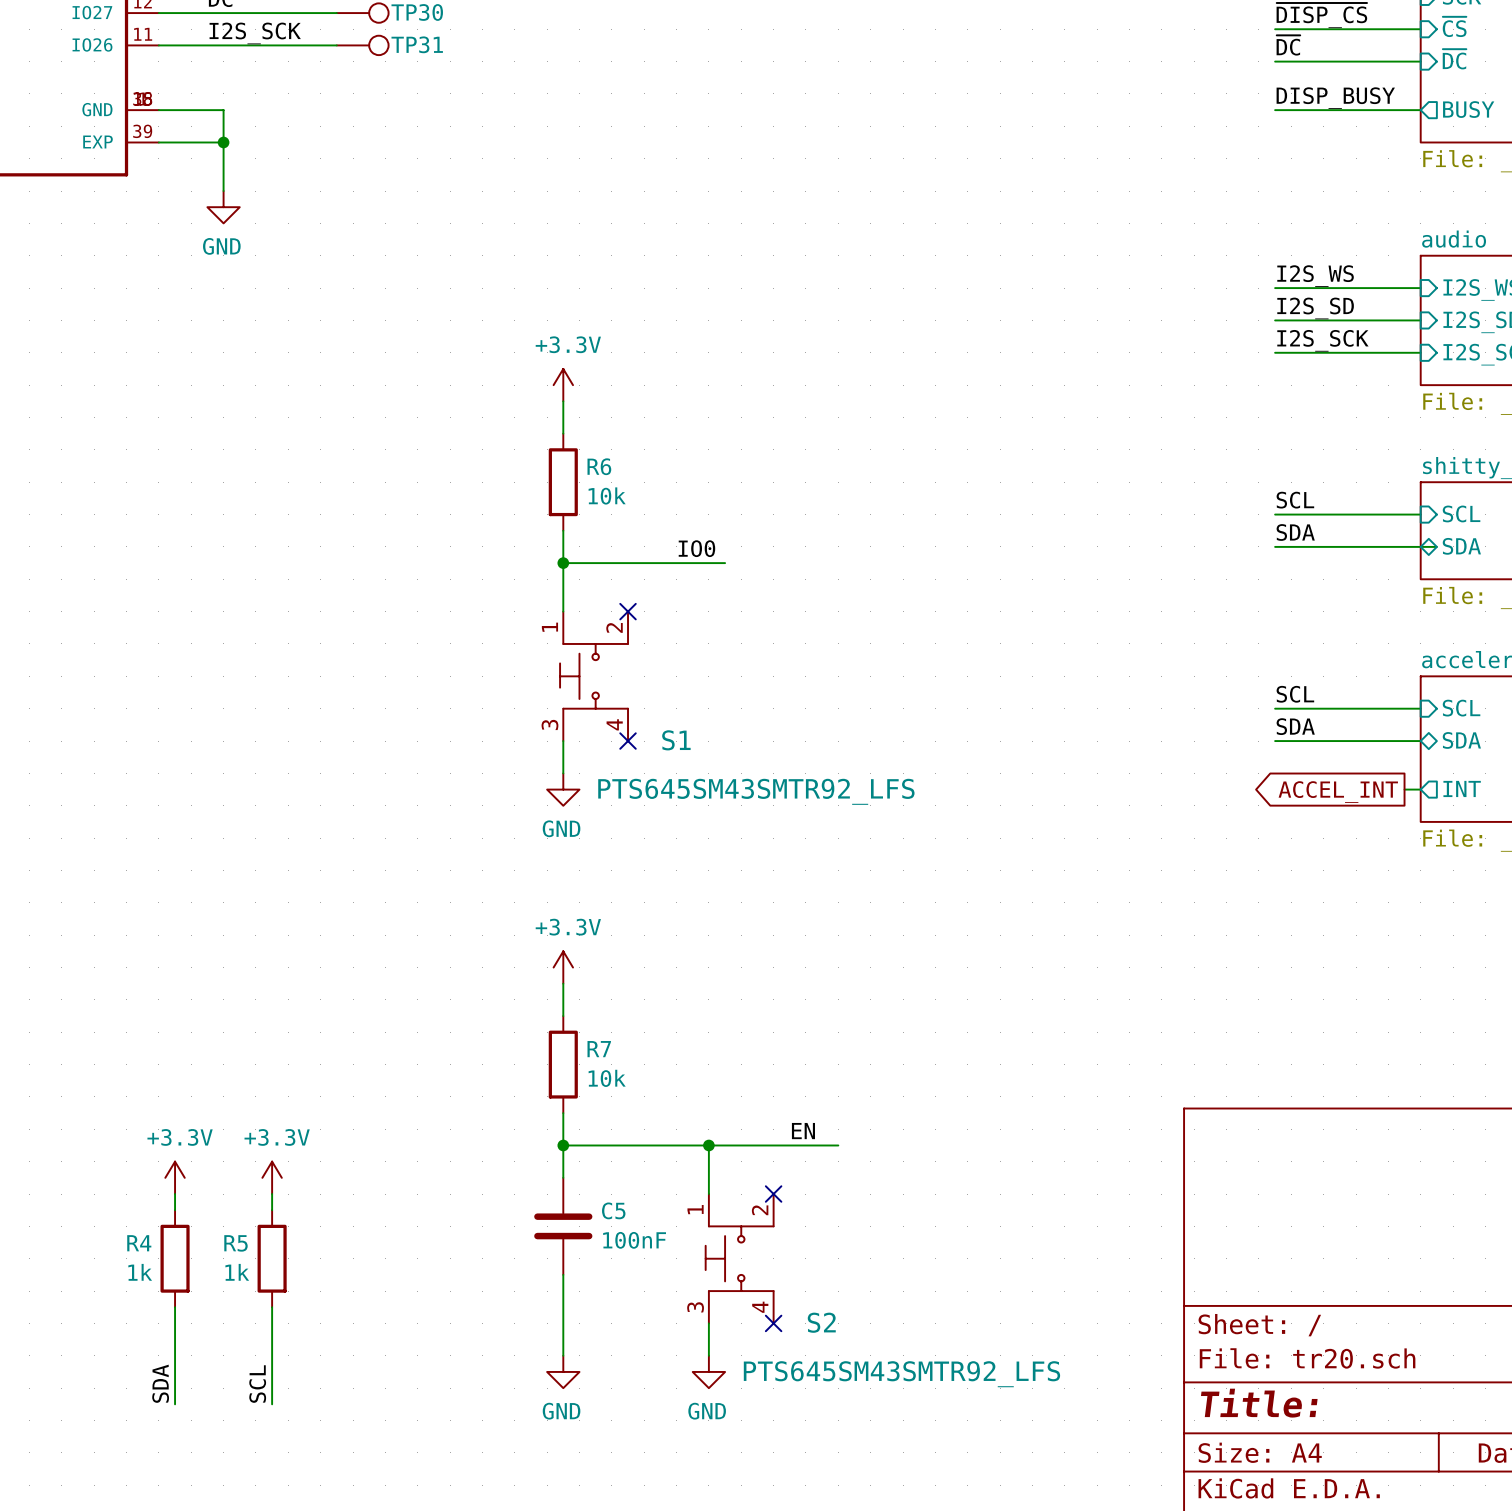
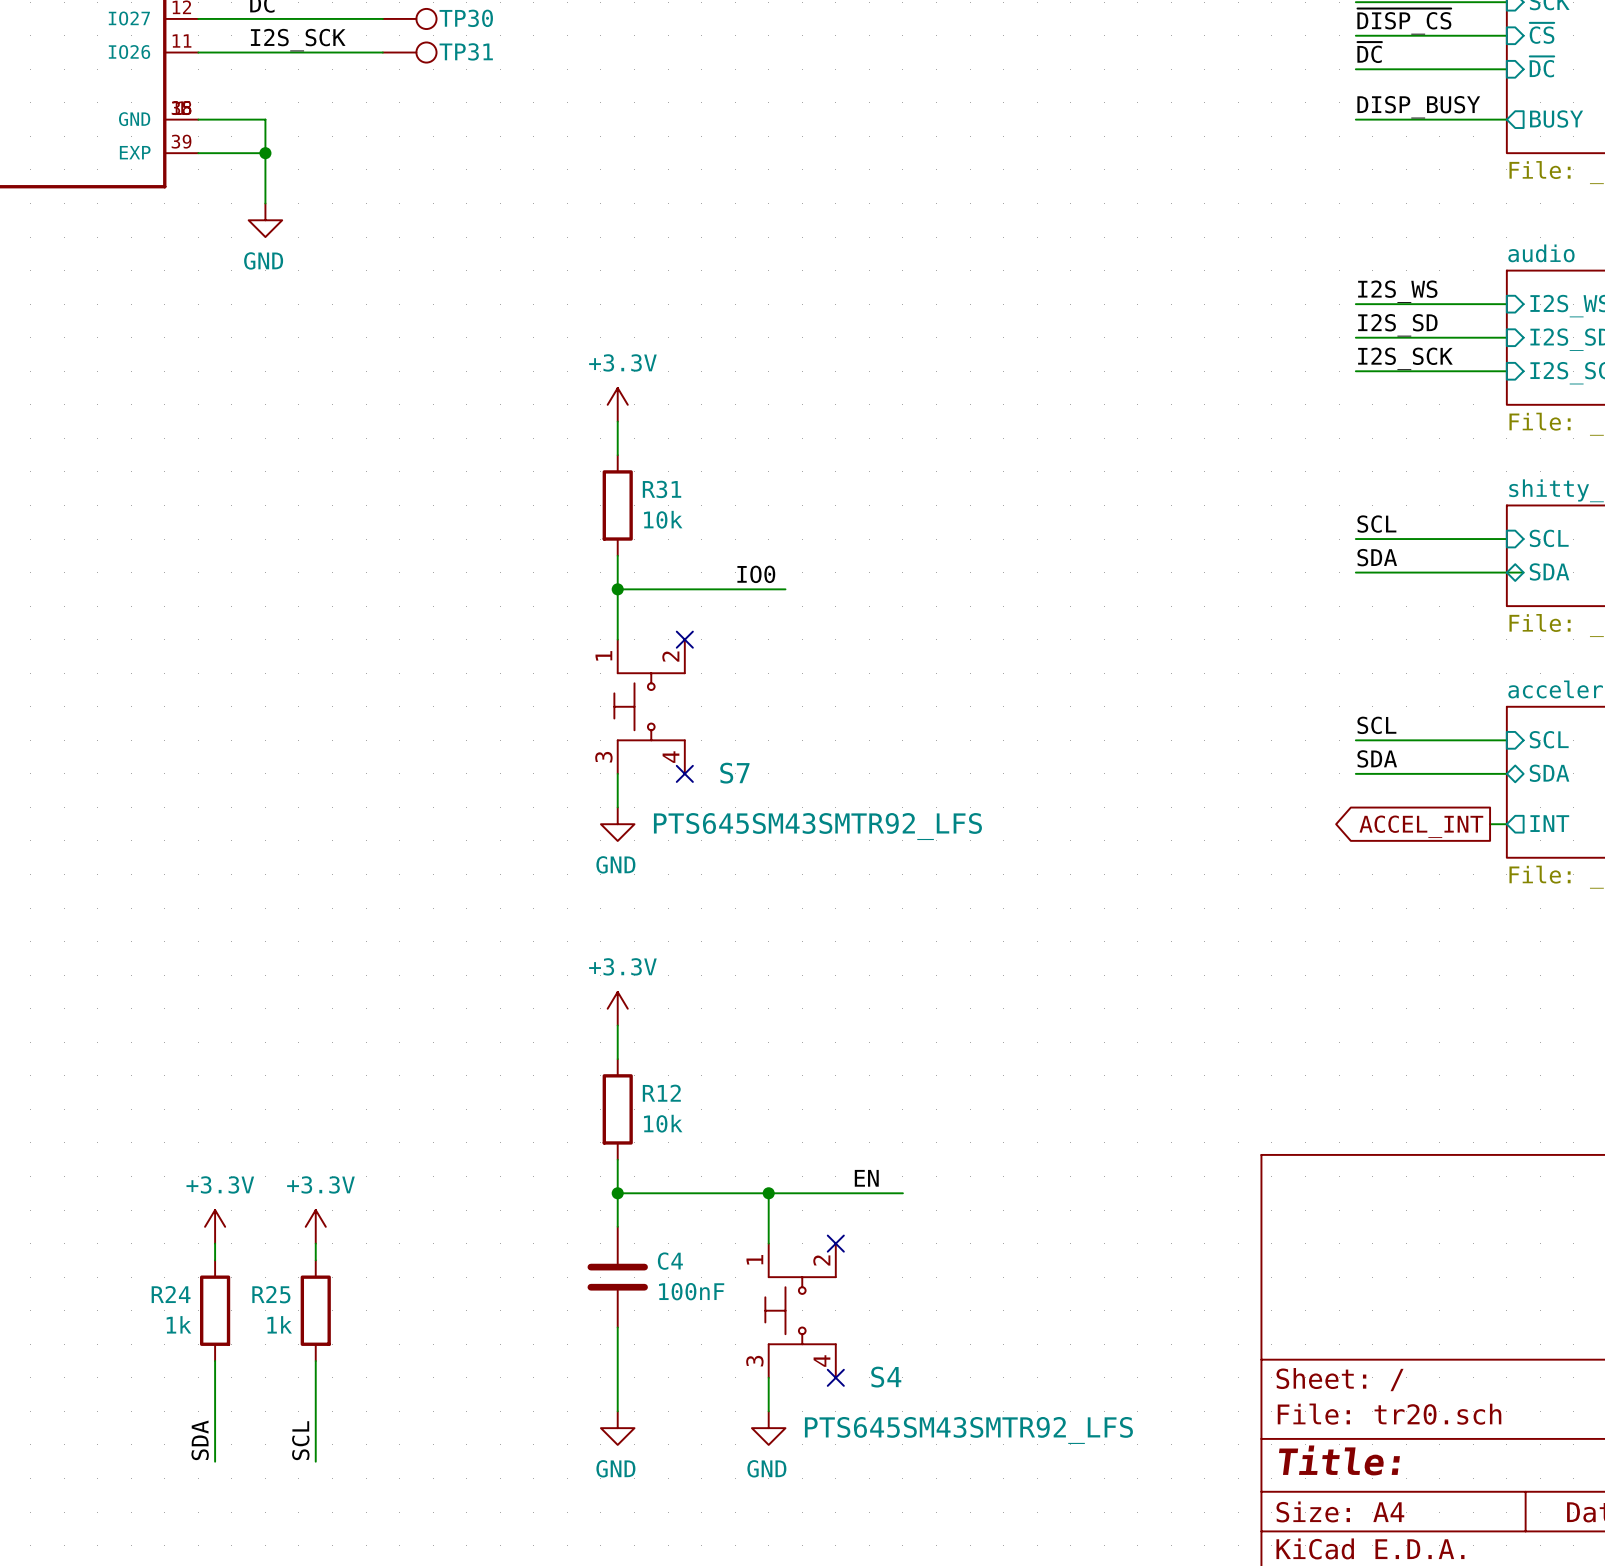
R6 name: R6 (599, 466) -> R31 (662, 489)
S1 name: S1 (676, 740) -> S7 (734, 773)
R7 name: R7 (599, 1049) -> R12 (661, 1093)
C5 name: C5 (613, 1210) -> C4 (670, 1261)
R4 name: R4 (139, 1243) -> R24 (171, 1294)
R5 name: R5 (235, 1243) -> R25 (271, 1294)
S2 name: S2 (821, 1322) -> S4 (886, 1377)

